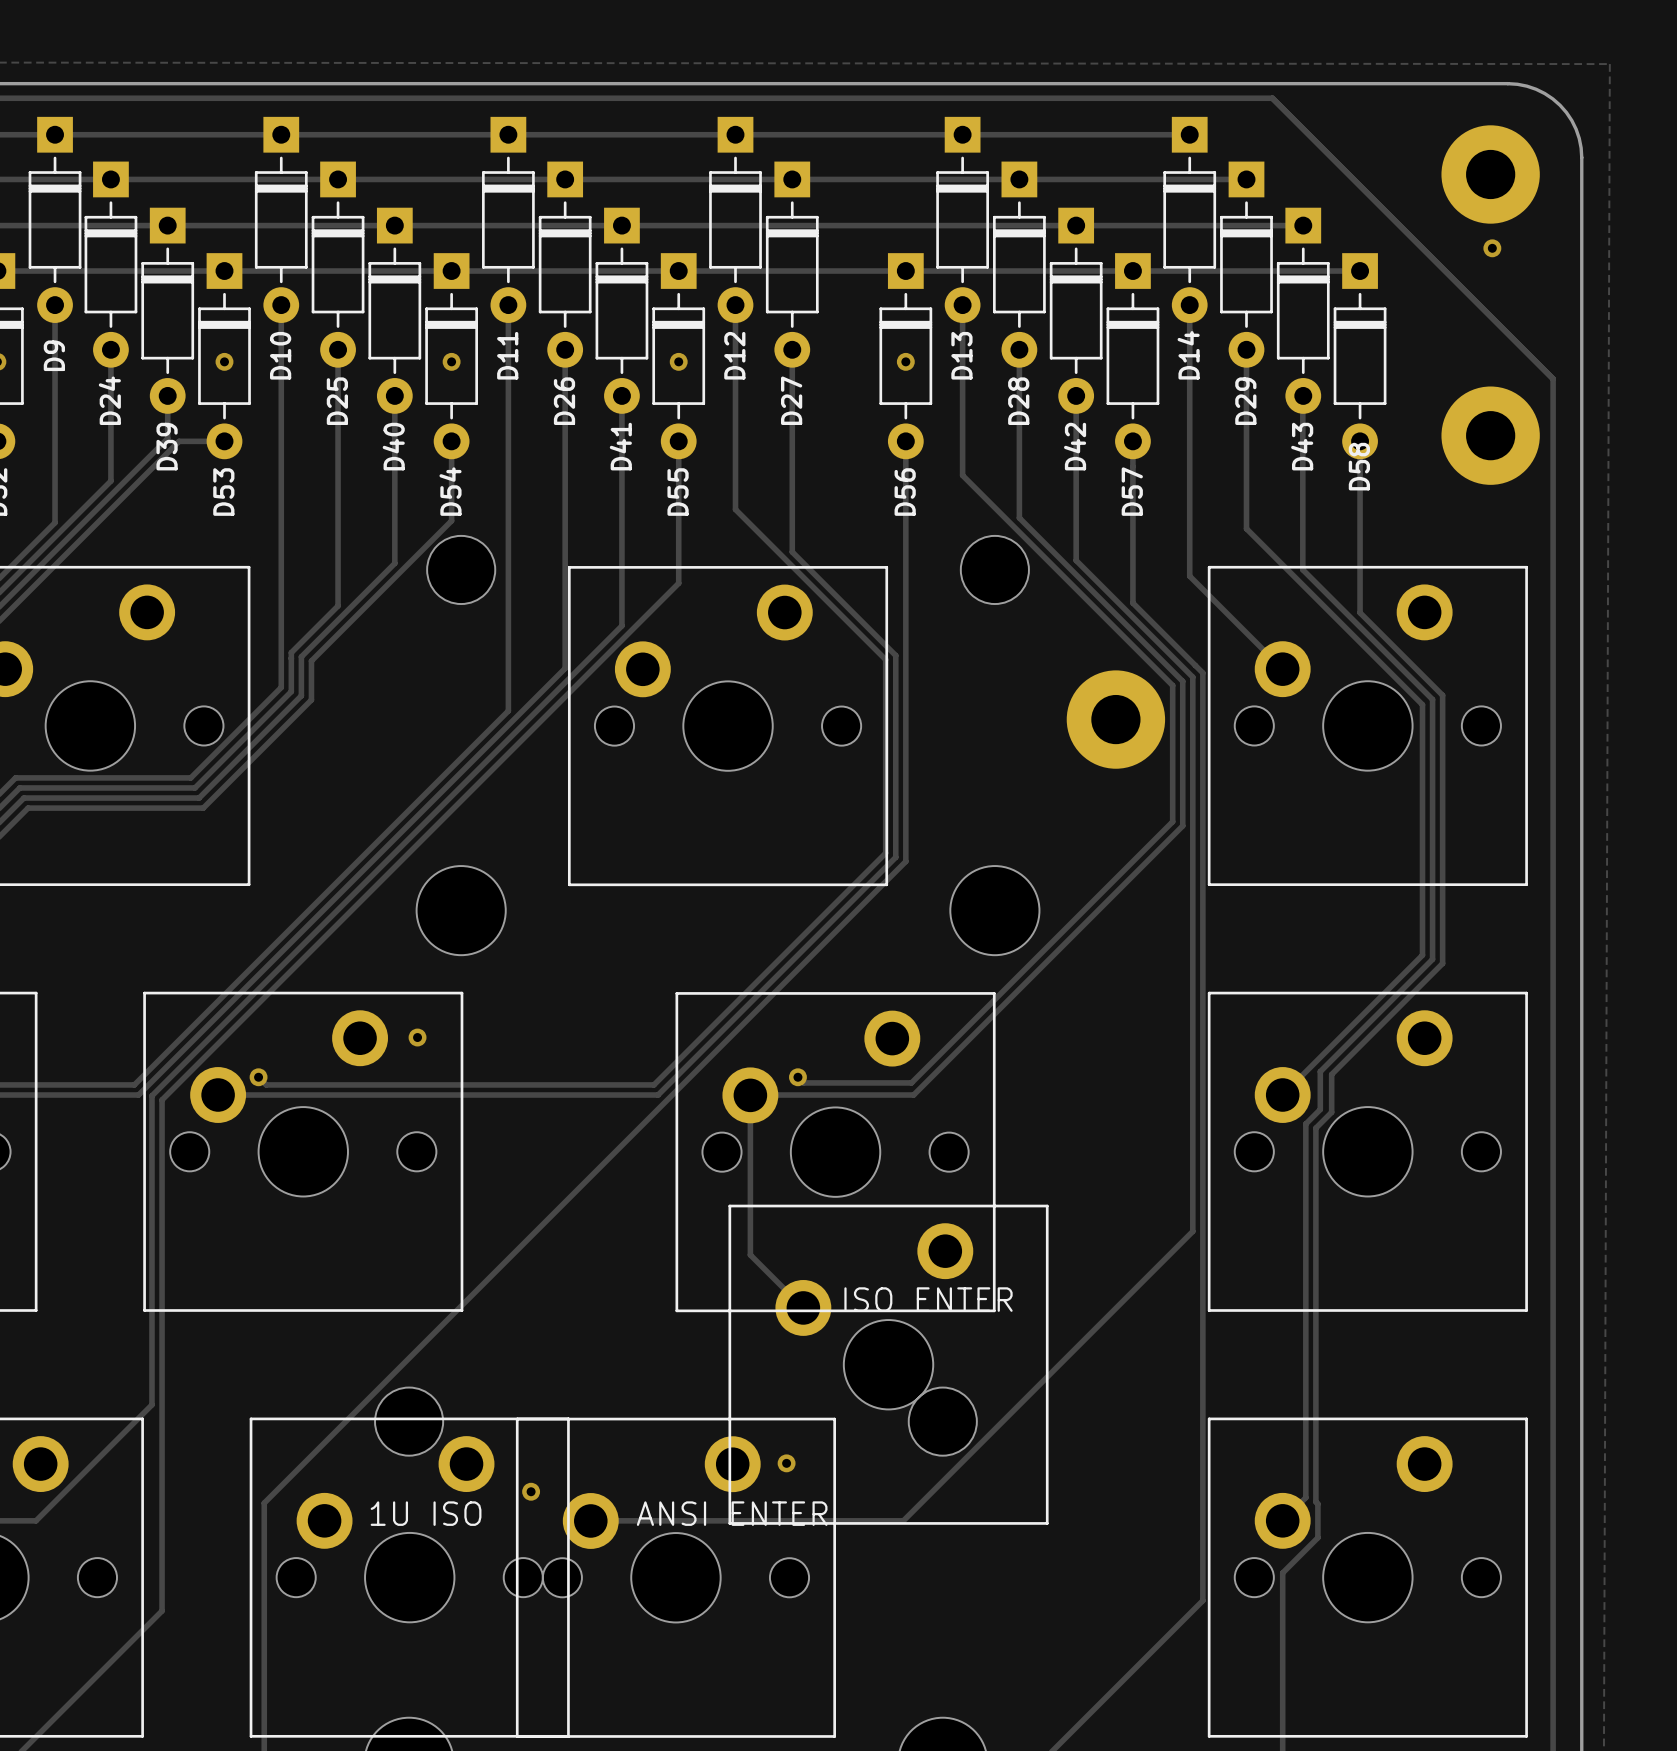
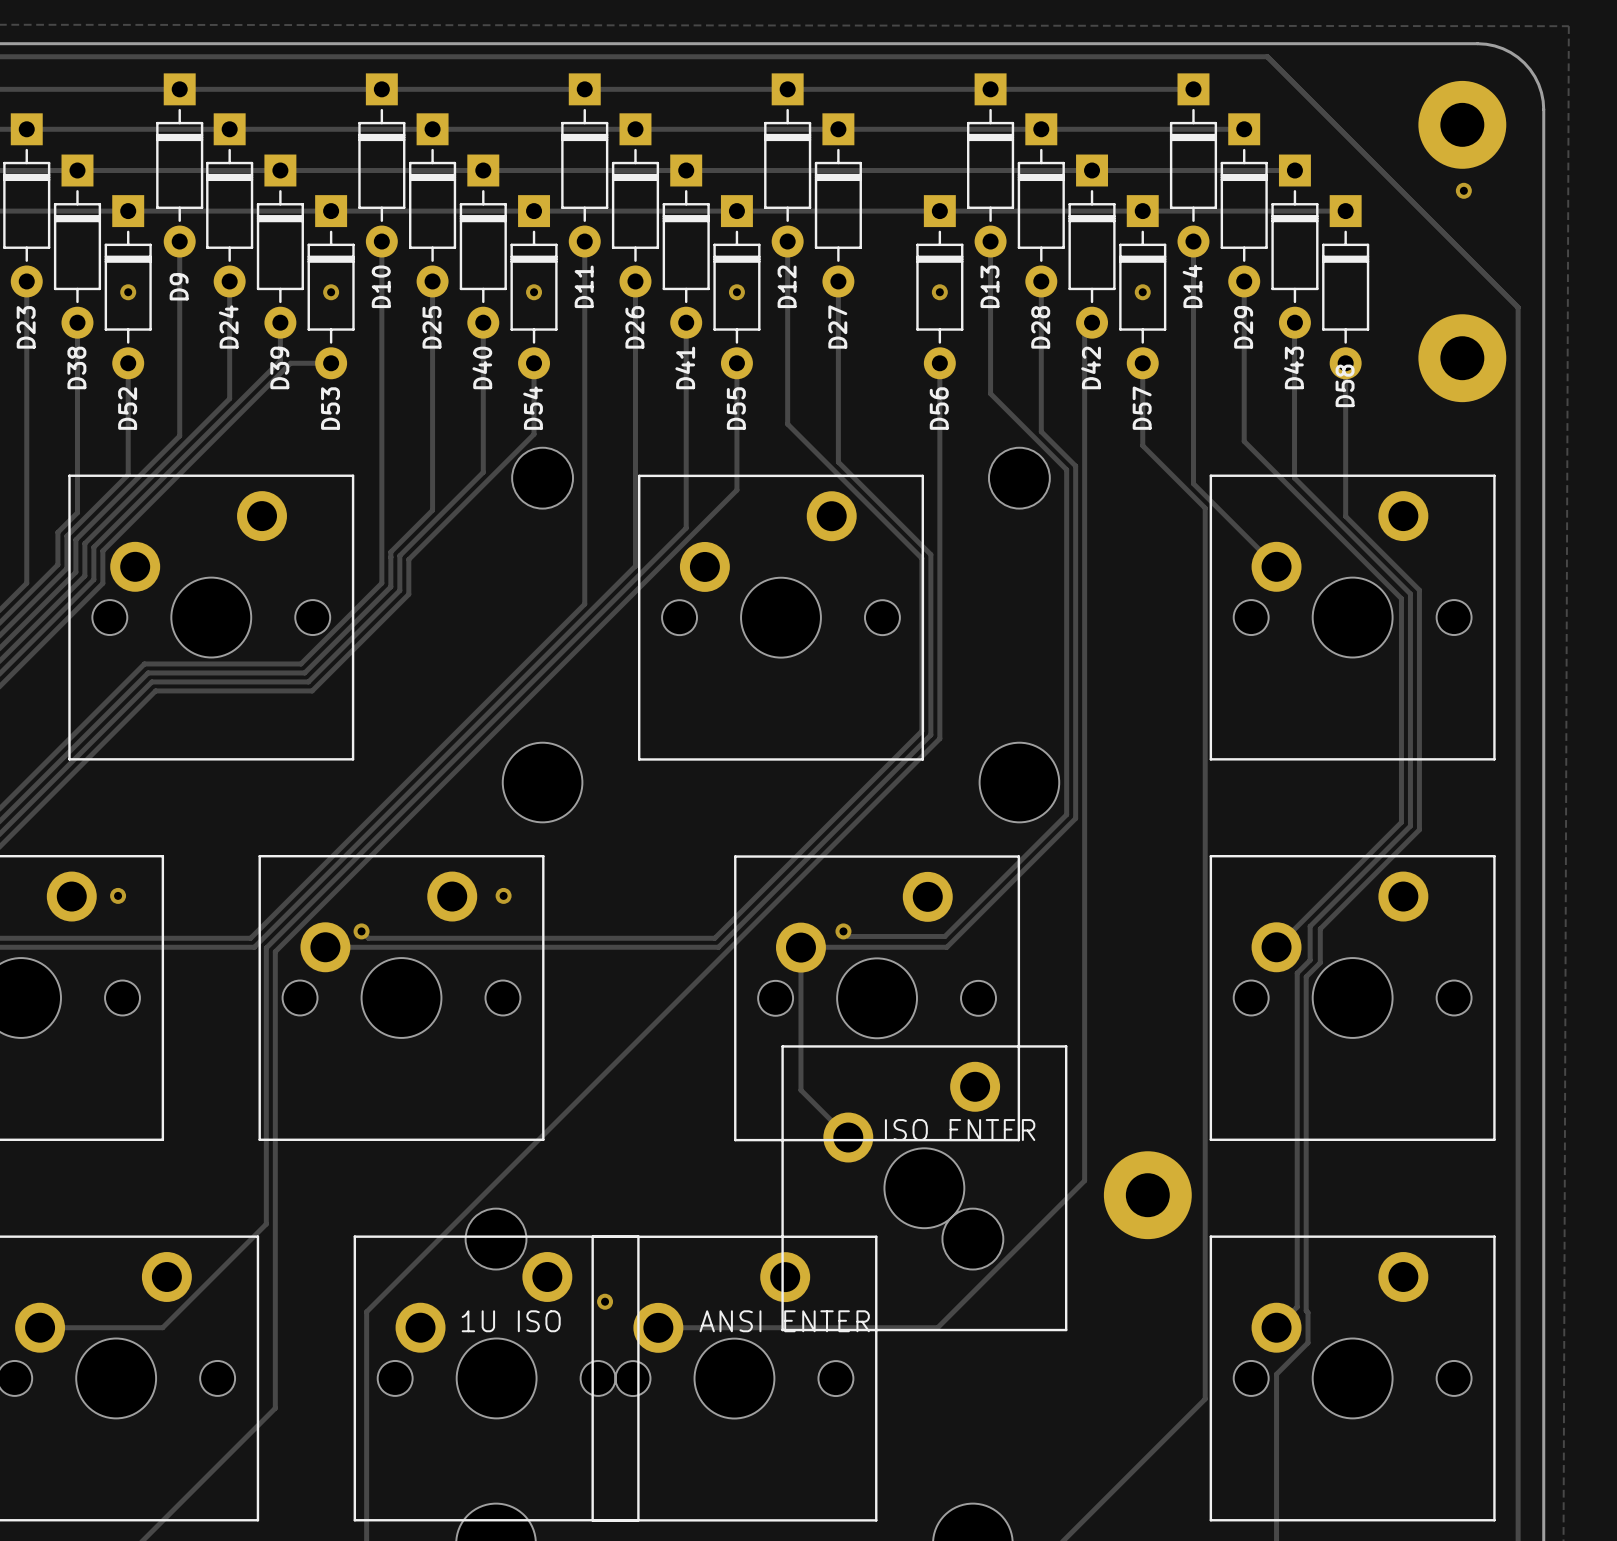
via: none -> (1142, 292)
track: (1076, 395) (1076, 560) (1192, 677) (1192, 1231) (1067, 1356) -> (1092, 322) (1084, 330) (1084, 1180)
track: (1132, 533) (1132, 603) (1202, 672) -> (1142, 445) (1205, 508) (1205, 570)
track: (1057, 556) (1182, 681) (1182, 825) (1057, 950) -> (1075, 466) (1075, 818)
track: (1047, 560) (1172, 685) (1172, 821) (1047, 946) -> (1066, 469) (1066, 814)
part: (1115, 719) -> none
part: none -> (1147, 1195)
via: (786, 1463) -> none

